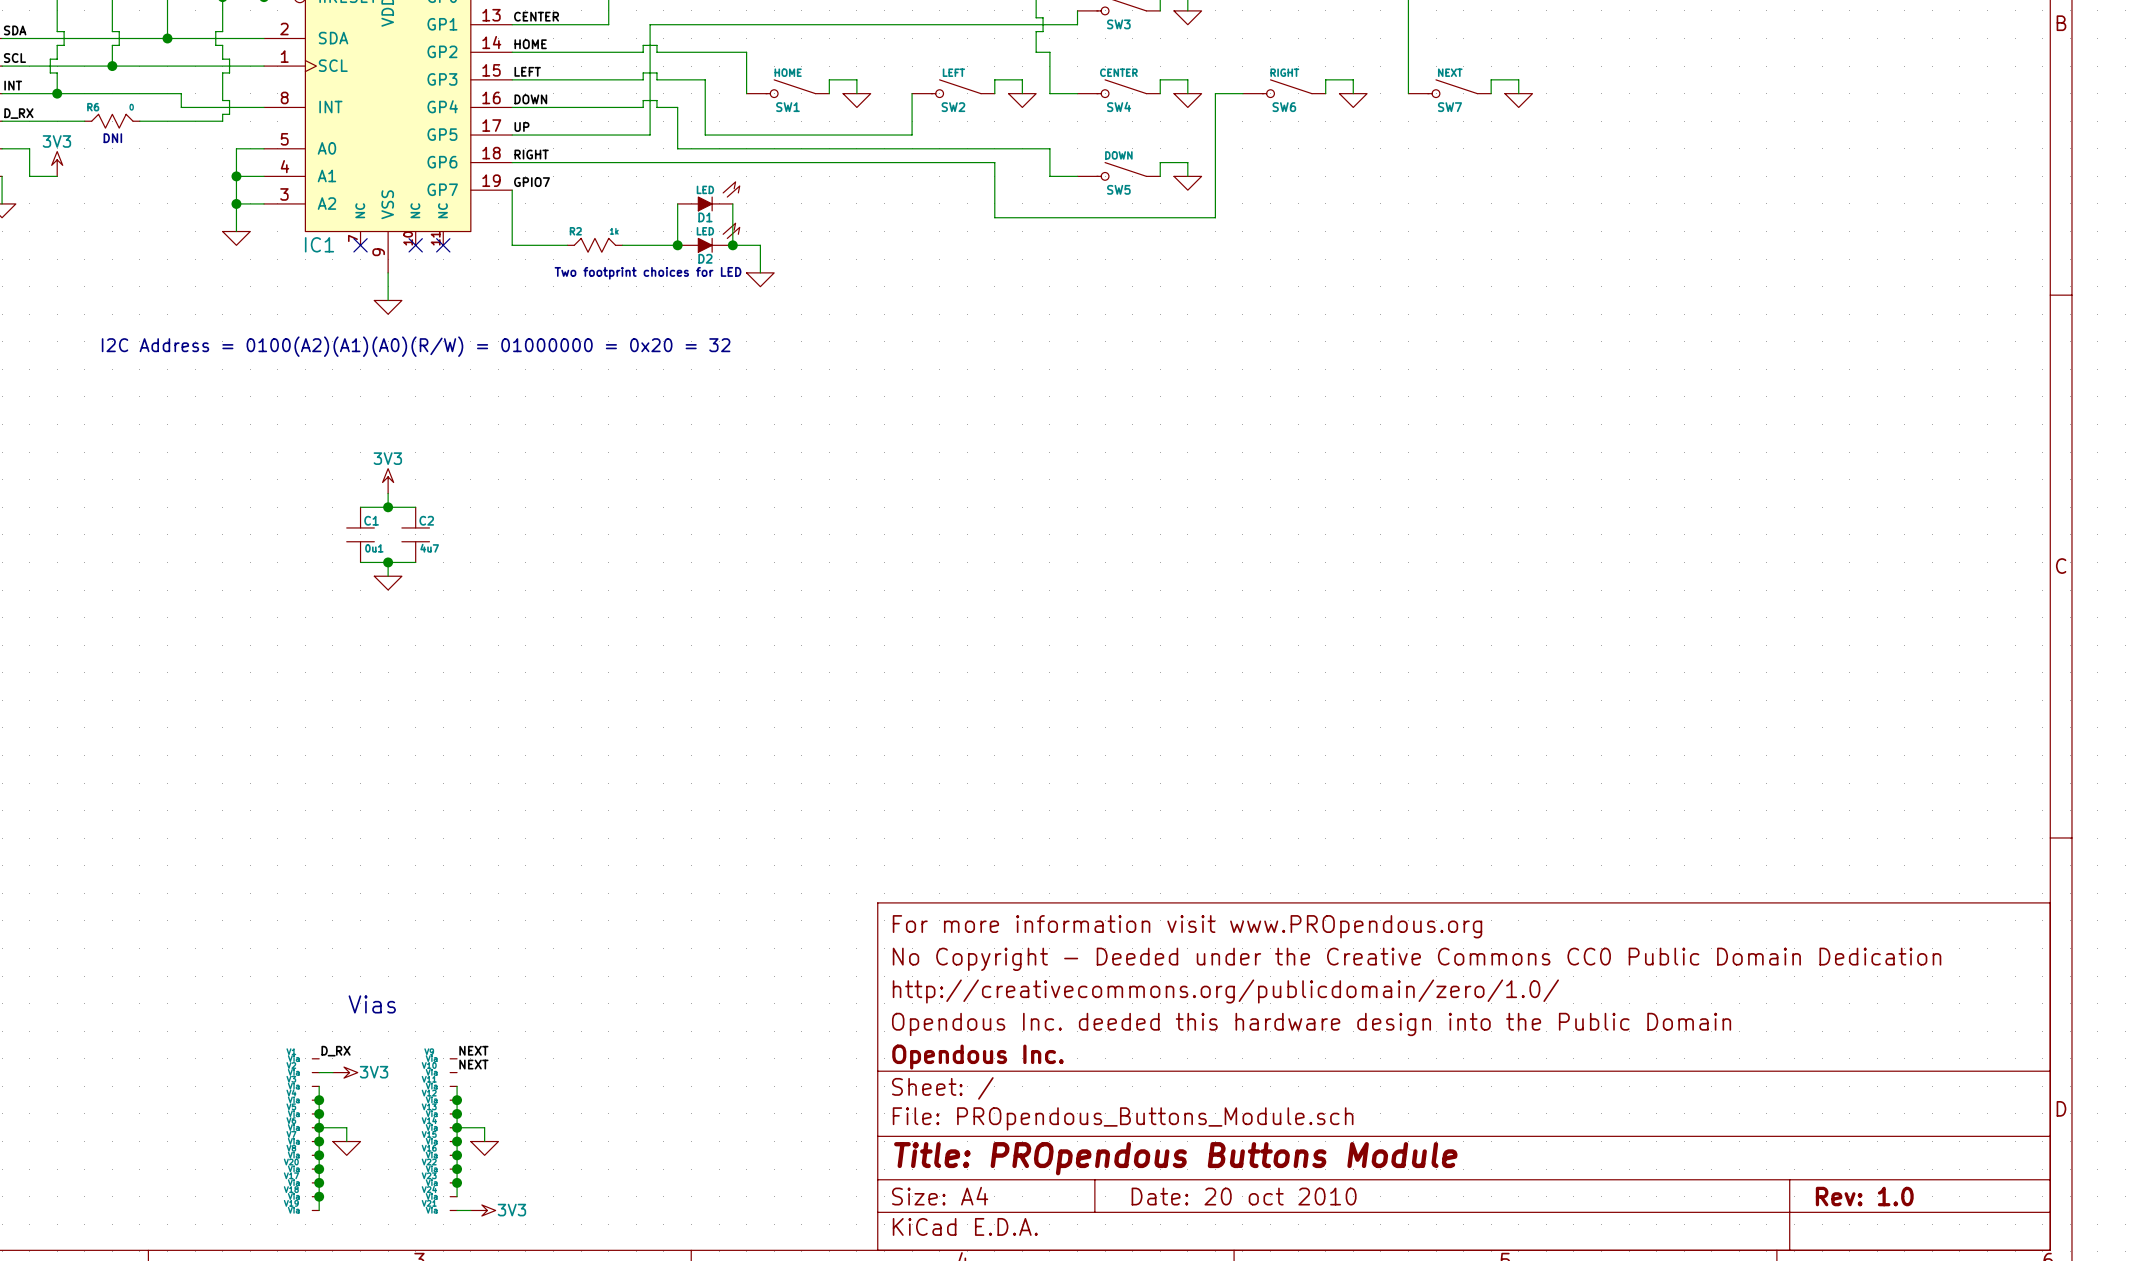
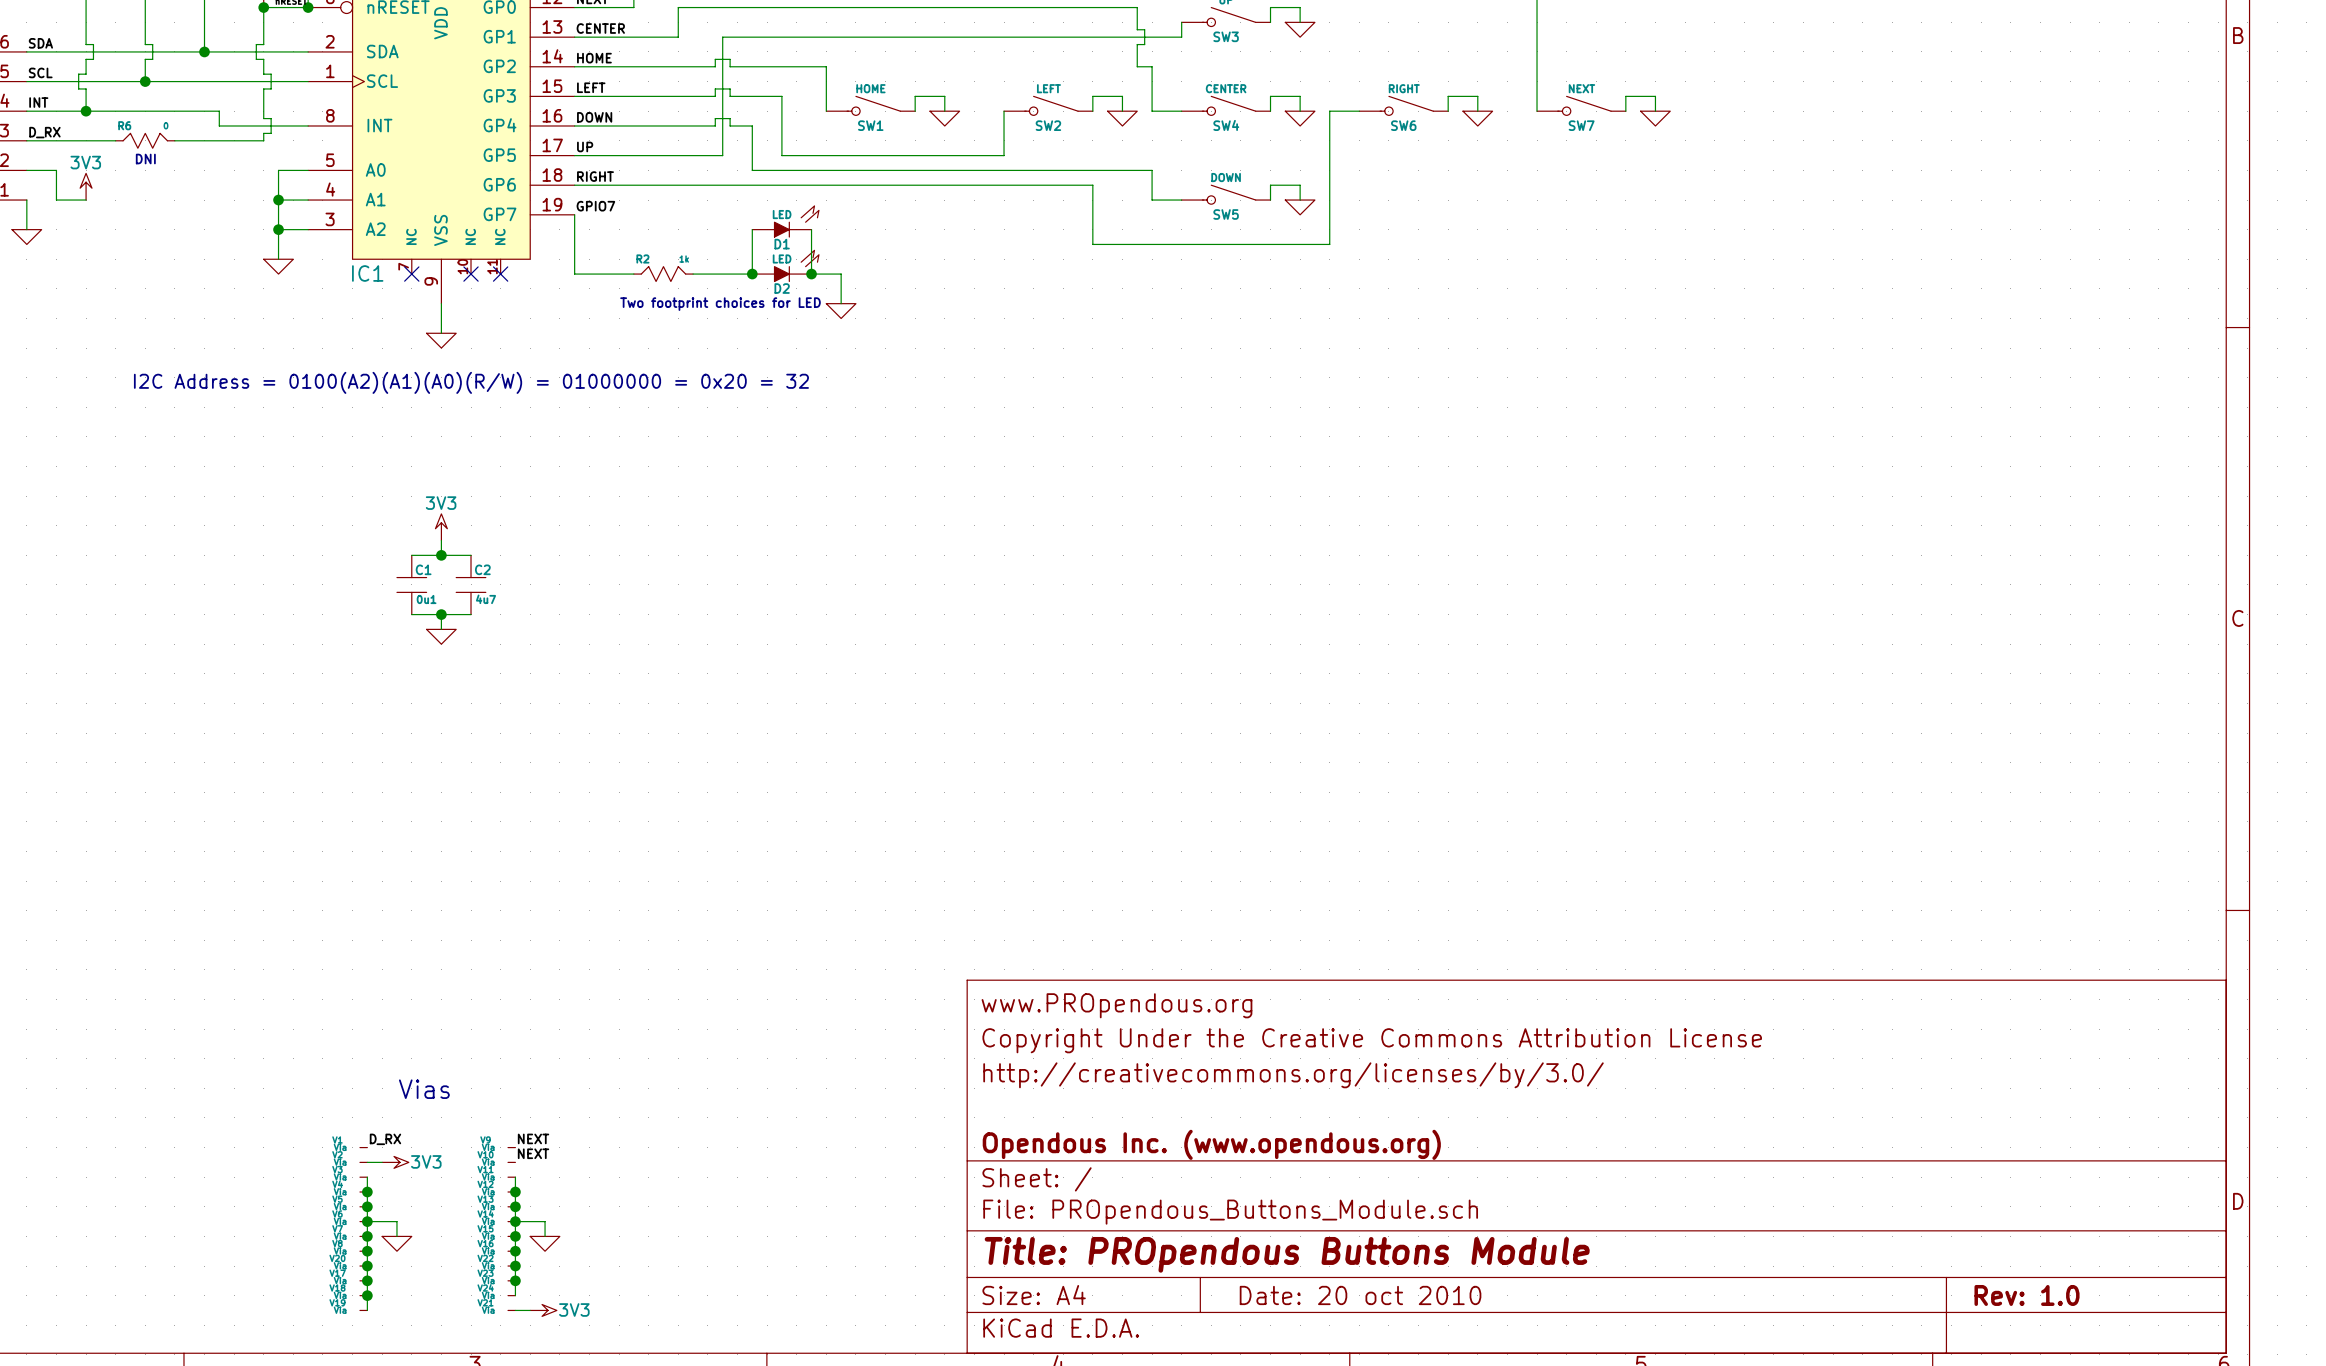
title block: For more information visit www.PROpendous.org (1187, 926) -> www.PROpendous.org (1116, 1005)
title block: No Copyright - Deeded under the Creative Commons CC0 Public Domain Dedication (1417, 959) -> Copyright Under the Creative Commons Attribution License (1372, 1040)
title block: http://creativecommons.org/publicdomain/zero/1.0/ (1225, 991) -> http://creativecommons.org/licenses/by/3.0/ (1293, 1075)
title block: Opendous Inc. deeded this hardware design into the Public Domain (1311, 1024) -> none
title block: Opendous Inc. (977, 1057) -> Opendous Inc. (www.opendous.org) (1211, 1144)

